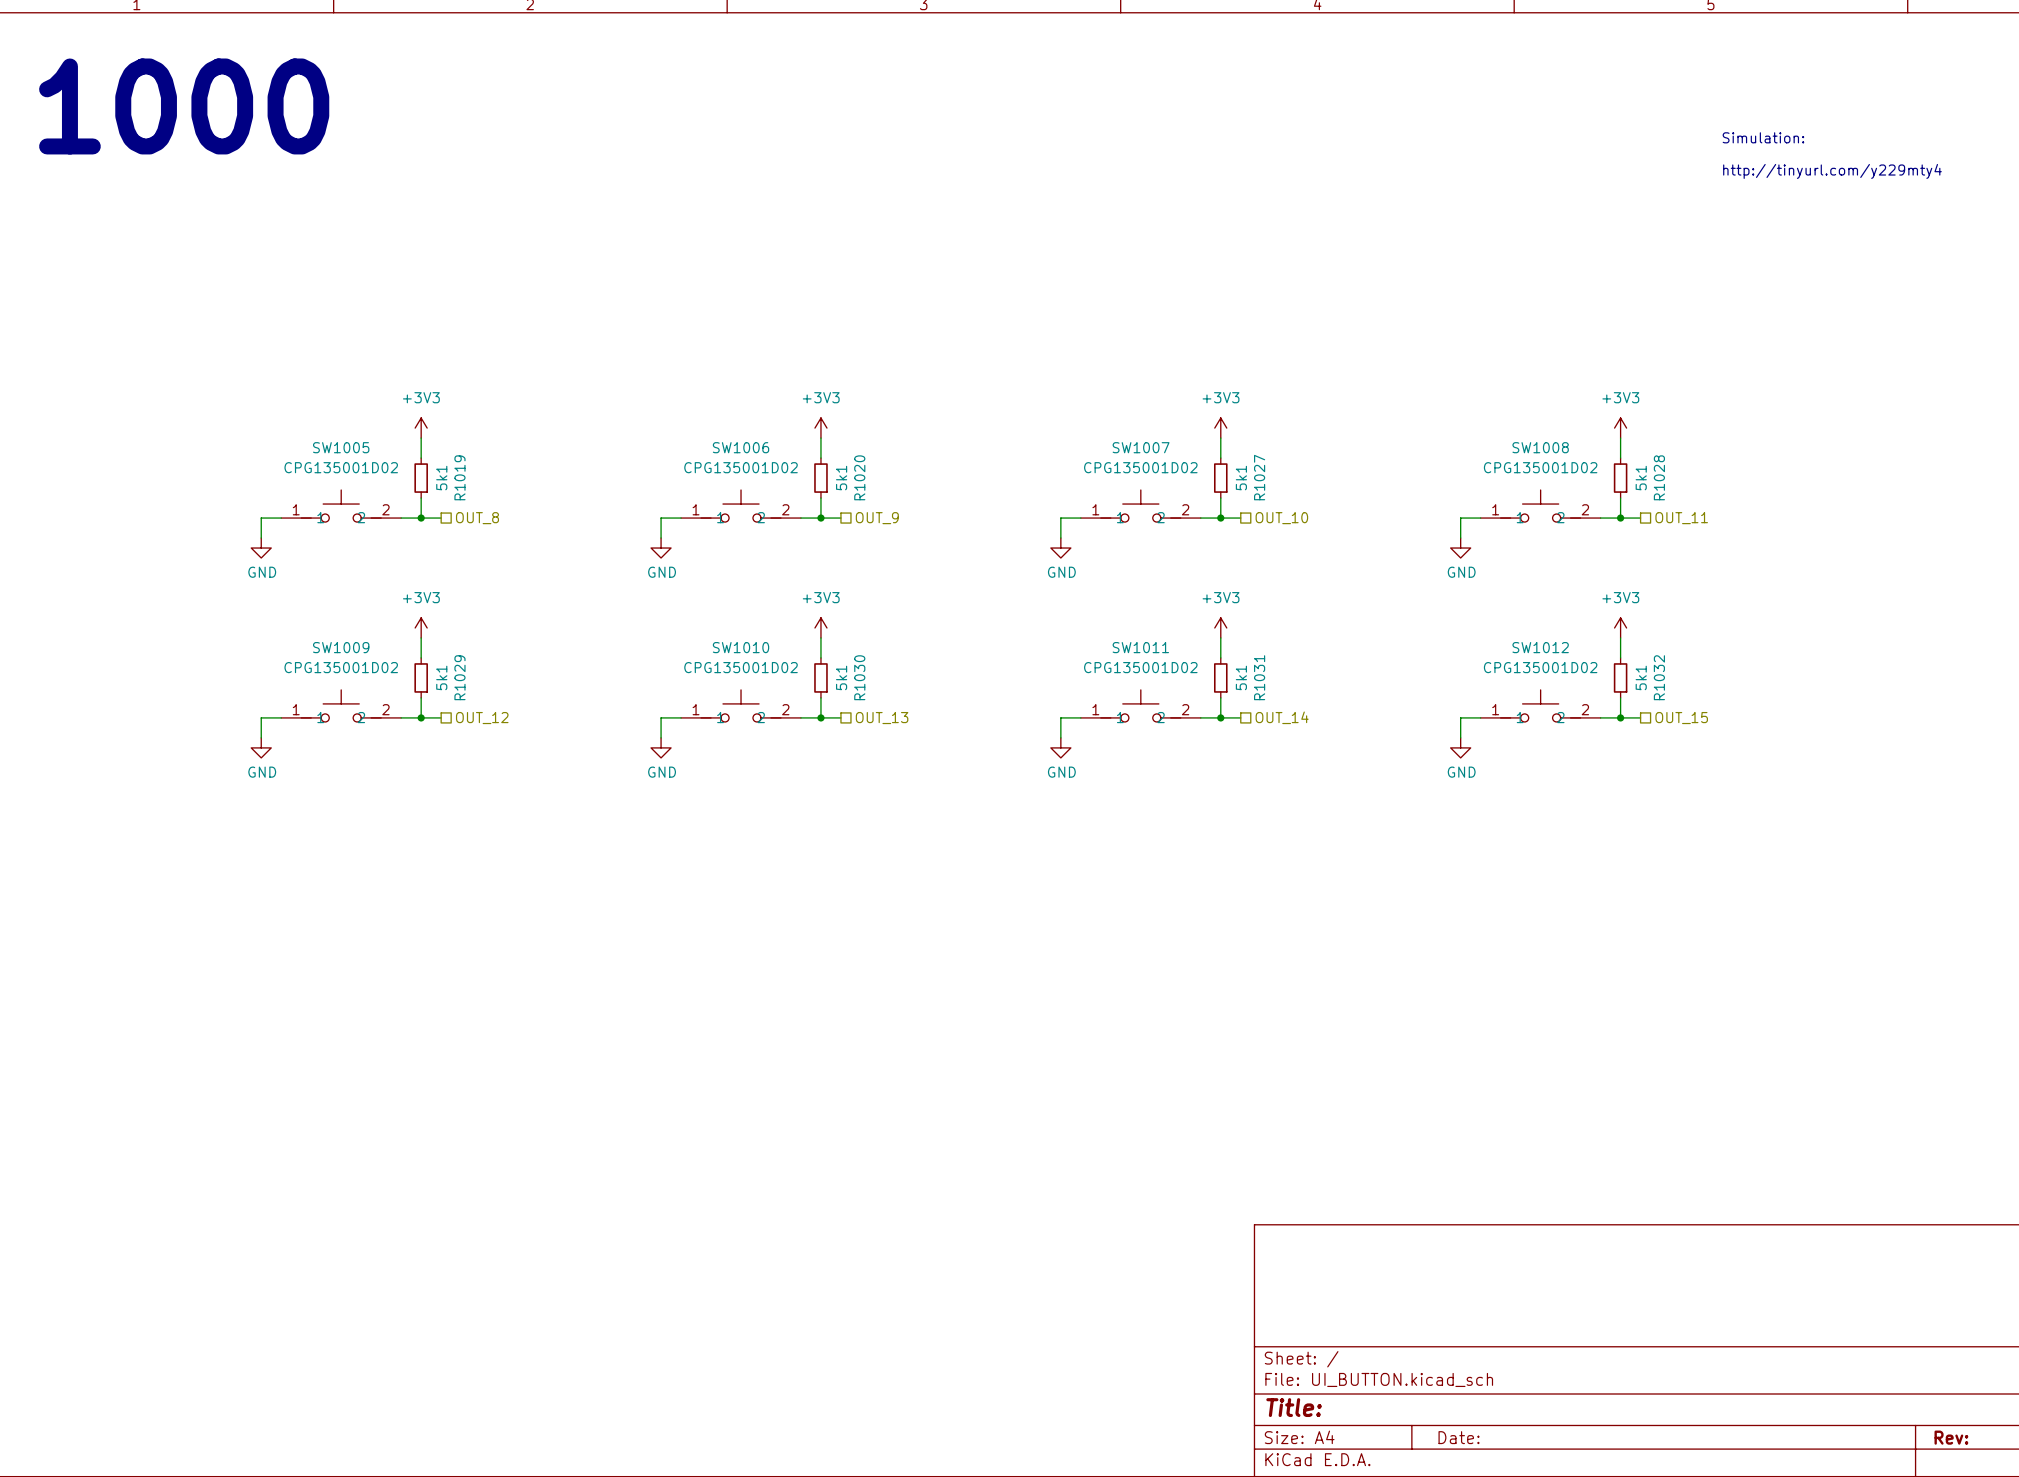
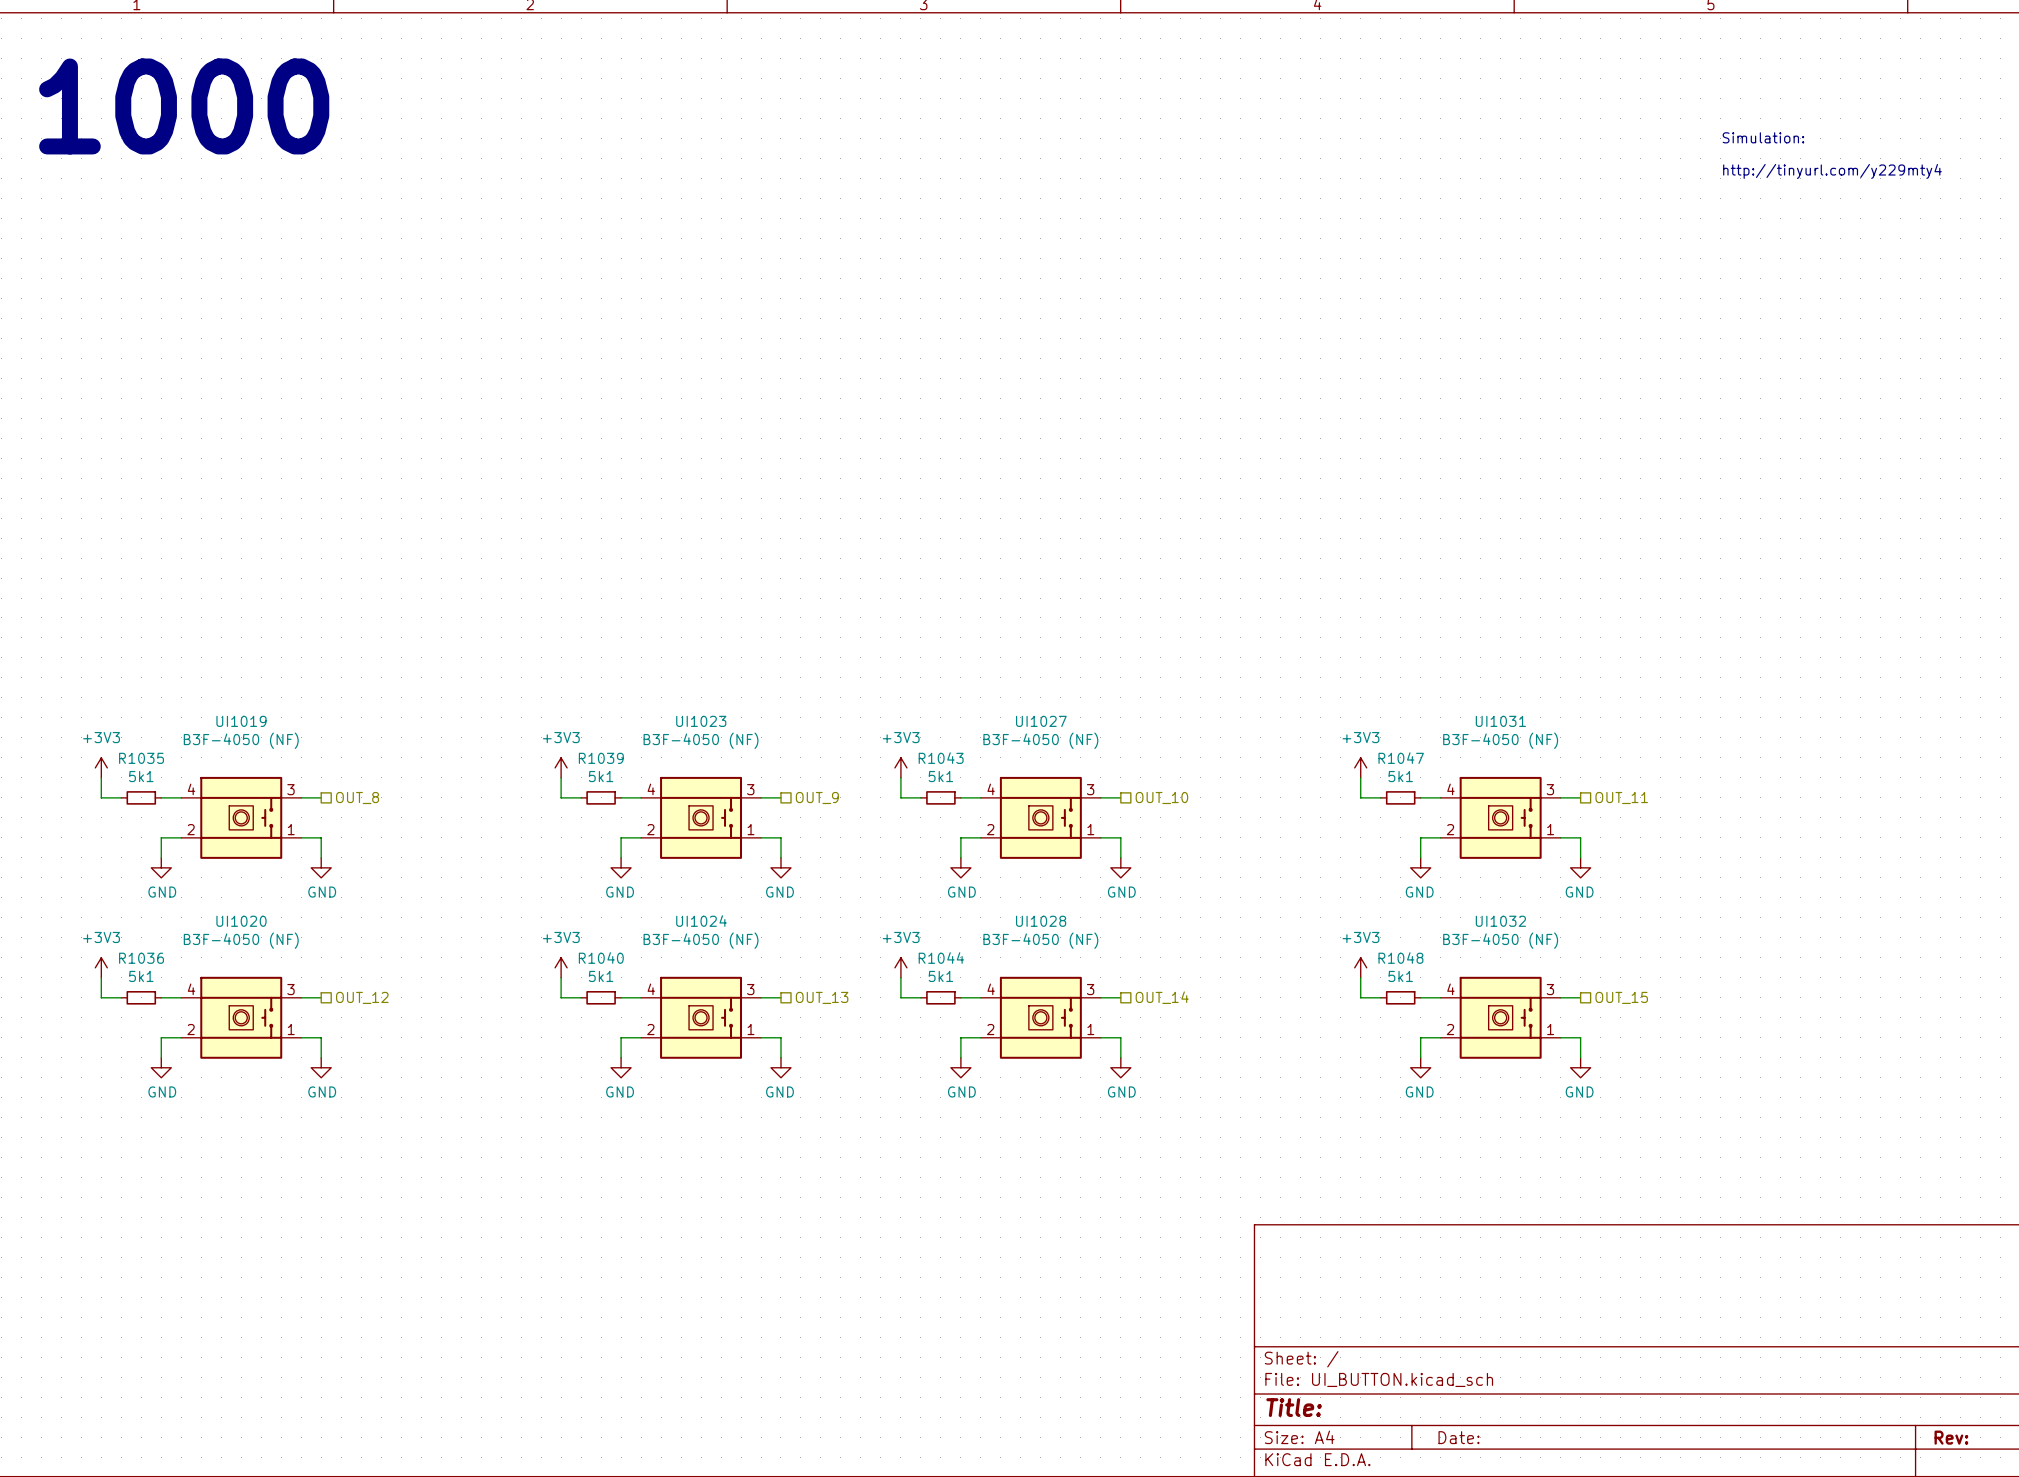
power symbol: +3V3 (421, 428) -> none
power symbol: +3V3 (820, 428) -> none
power symbol: +3V3 (1220, 428) -> none
power symbol: +3V3 (1620, 428) -> none
wire: (421, 438) (421, 458) -> none
wire: (820, 438) (820, 458) -> none
wire: (1220, 438) (1220, 458) -> none
wire: (1620, 438) (1620, 458) -> none
R1019: 5k1 (421, 478) -> none
R1020: 5k1 (820, 478) -> none
R1027: 5k1 (1220, 478) -> none
R1028: 5k1 (1620, 478) -> none
wire: (421, 498) (421, 518) -> none
wire: (820, 498) (820, 518) -> none
wire: (1220, 498) (1220, 518) -> none
wire: (1620, 498) (1620, 518) -> none
SW1005: CPG135001D02 (341, 506) -> none
SW1006: CPG135001D02 (741, 506) -> none
SW1007: CPG135001D02 (1140, 506) -> none
SW1008: CPG135001D02 (1540, 506) -> none
wire: (281, 518) (261, 518) (261, 538) -> none
wire: (401, 518) (441, 518) -> none
junction: (421, 518) -> none
hierarchical label: OUT_8 (477, 518) -> none
wire: (681, 518) (661, 518) (661, 538) -> none
wire: (800, 518) (840, 518) -> none
junction: (820, 518) -> none
hierarchical label: OUT_9 (877, 518) -> none
wire: (1080, 518) (1060, 518) (1060, 538) -> none
wire: (1200, 518) (1240, 518) -> none
junction: (1220, 518) -> none
hierarchical label: OUT_10 (1281, 518) -> none
wire: (1480, 518) (1460, 518) (1460, 538) -> none
wire: (1600, 518) (1640, 518) -> none
junction: (1620, 518) -> none
hierarchical label: OUT_11 (1681, 518) -> none
power symbol: GND (261, 548) -> none
power symbol: GND (661, 548) -> none
power symbol: GND (1060, 548) -> none
power symbol: GND (1460, 548) -> none
power symbol: +3V3 (421, 627) -> none
power symbol: +3V3 (820, 627) -> none
power symbol: +3V3 (1220, 627) -> none
power symbol: +3V3 (1620, 627) -> none
wire: (421, 637) (421, 657) -> none
wire: (820, 637) (820, 657) -> none
wire: (1220, 637) (1220, 657) -> none
wire: (1620, 637) (1620, 657) -> none
R1029: 5k1 (421, 677) -> none
R1030: 5k1 (820, 677) -> none
R1031: 5k1 (1220, 677) -> none
R1032: 5k1 (1620, 677) -> none
wire: (421, 697) (421, 717) -> none
wire: (820, 697) (820, 717) -> none
wire: (1220, 697) (1220, 717) -> none
wire: (1620, 697) (1620, 717) -> none
SW1009: CPG135001D02 (341, 705) -> none
SW1010: CPG135001D02 (741, 705) -> none
SW1011: CPG135001D02 (1140, 705) -> none
SW1012: CPG135001D02 (1540, 705) -> none
wire: (281, 717) (261, 717) (261, 737) -> (181, 837) (161, 837) (161, 857)
wire: (401, 717) (441, 717) -> none
junction: (421, 717) -> none
wire: (681, 717) (661, 717) (661, 737) -> (641, 837) (621, 837) (621, 857)
wire: (800, 717) (840, 717) -> none
junction: (820, 717) -> none
wire: (1080, 717) (1060, 717) (1060, 737) -> (980, 837) (960, 837) (960, 857)
wire: (1200, 717) (1240, 717) -> none
junction: (1220, 717) -> none
hierarchical label: OUT_14 (1282, 717) -> none
wire: (1480, 717) (1460, 717) (1460, 737) -> (1440, 837) (1420, 837) (1420, 857)
wire: (1600, 717) (1640, 717) -> none
junction: (1620, 717) -> none
hierarchical label: OUT_12 (482, 718) -> none
hierarchical label: OUT_13 (882, 718) -> none
hierarchical label: OUT_15 (1681, 718) -> none
power symbol: GND (261, 747) -> none
power symbol: GND (661, 747) -> none
power symbol: GND (1060, 747) -> none
power symbol: GND (1460, 747) -> none
power symbol: none -> +3V3 (101, 767)
power symbol: none -> +3V3 (561, 767)
power symbol: none -> +3V3 (900, 767)
power symbol: none -> +3V3 (1360, 767)
wire: none -> (101, 777) (101, 797) (121, 797)
wire: none -> (561, 777) (561, 797) (581, 797)
wire: none -> (900, 777) (900, 797) (920, 797)
wire: none -> (1360, 777) (1360, 797) (1380, 797)
R1035: none -> 5k1 (141, 797)
wire: none -> (161, 797) (181, 797)
wire: none -> (301, 797) (321, 797)
R1039: none -> 5k1 (601, 797)
wire: none -> (621, 797) (641, 797)
wire: none -> (761, 797) (780, 797)
R1043: none -> 5k1 (940, 797)
wire: none -> (960, 797) (980, 797)
wire: none -> (1100, 797) (1120, 797)
R1047: none -> 5k1 (1400, 797)
wire: none -> (1420, 797) (1440, 797)
wire: none -> (1560, 797) (1580, 797)
hierarchical label: none -> OUT_8 (357, 798)
hierarchical label: none -> OUT_9 (817, 798)
hierarchical label: none -> OUT_10 (1161, 798)
hierarchical label: none -> OUT_11 (1621, 798)
UI1019: none -> B3F-4050 (NF) (241, 817)
UI1023: none -> B3F-4050 (NF) (701, 817)
UI1027: none -> B3F-4050 (NF) (1040, 817)
UI1031: none -> B3F-4050 (NF) (1500, 817)
wire: none -> (301, 837) (321, 837) (321, 857)
wire: none -> (761, 837) (780, 837) (780, 857)
wire: none -> (1100, 837) (1120, 837) (1120, 857)
wire: none -> (1560, 837) (1580, 837) (1580, 857)
power symbol: none -> GND (161, 867)
power symbol: none -> GND (321, 867)
power symbol: none -> GND (621, 867)
power symbol: none -> GND (780, 867)
power symbol: none -> GND (960, 867)
power symbol: none -> GND (1120, 867)
power symbol: none -> GND (1420, 867)
power symbol: none -> GND (1580, 867)
power symbol: none -> +3V3 (101, 967)
power symbol: none -> +3V3 (561, 967)
power symbol: none -> +3V3 (900, 967)
power symbol: none -> +3V3 (1360, 967)
wire: none -> (101, 977) (101, 997) (121, 997)
wire: none -> (561, 977) (561, 997) (581, 997)
wire: none -> (900, 977) (900, 997) (920, 997)
wire: none -> (1360, 977) (1360, 997) (1380, 997)
R1036: none -> 5k1 (141, 997)
wire: none -> (161, 997) (181, 997)
wire: none -> (301, 997) (321, 997)
hierarchical label: none -> OUT_12 (362, 997)
R1040: none -> 5k1 (601, 997)
wire: none -> (621, 997) (641, 997)
wire: none -> (761, 997) (780, 997)
hierarchical label: none -> OUT_13 (822, 997)
R1044: none -> 5k1 (940, 997)
wire: none -> (960, 997) (980, 997)
wire: none -> (1100, 997) (1120, 997)
hierarchical label: none -> OUT_14 (1162, 997)
R1048: none -> 5k1 (1400, 997)
wire: none -> (1420, 997) (1440, 997)
wire: none -> (1560, 997) (1580, 997)
hierarchical label: none -> OUT_15 (1621, 997)
UI1020: none -> B3F-4050 (NF) (241, 1017)
UI1024: none -> B3F-4050 (NF) (701, 1017)
UI1028: none -> B3F-4050 (NF) (1040, 1017)
UI1032: none -> B3F-4050 (NF) (1500, 1017)
wire: none -> (181, 1037) (161, 1037) (161, 1057)
wire: none -> (301, 1037) (321, 1037) (321, 1057)
wire: none -> (641, 1037) (621, 1037) (621, 1057)
wire: none -> (761, 1037) (780, 1037) (780, 1057)
wire: none -> (980, 1037) (960, 1037) (960, 1057)
wire: none -> (1100, 1037) (1120, 1037) (1120, 1057)
wire: none -> (1440, 1037) (1420, 1037) (1420, 1057)
wire: none -> (1560, 1037) (1580, 1037) (1580, 1057)
power symbol: none -> GND (161, 1067)
power symbol: none -> GND (321, 1067)
power symbol: none -> GND (621, 1067)
power symbol: none -> GND (780, 1067)
power symbol: none -> GND (960, 1067)
power symbol: none -> GND (1120, 1067)
power symbol: none -> GND (1420, 1067)
power symbol: none -> GND (1580, 1067)

